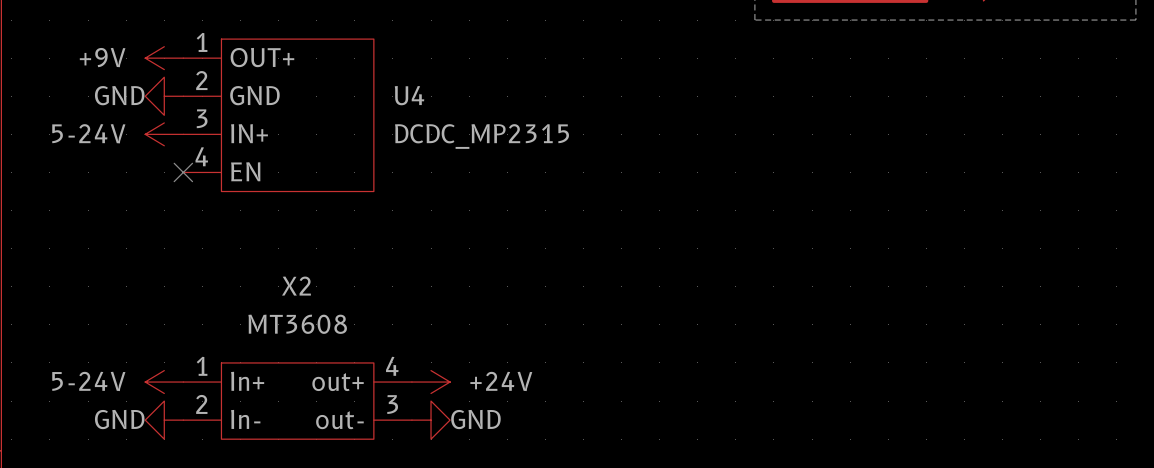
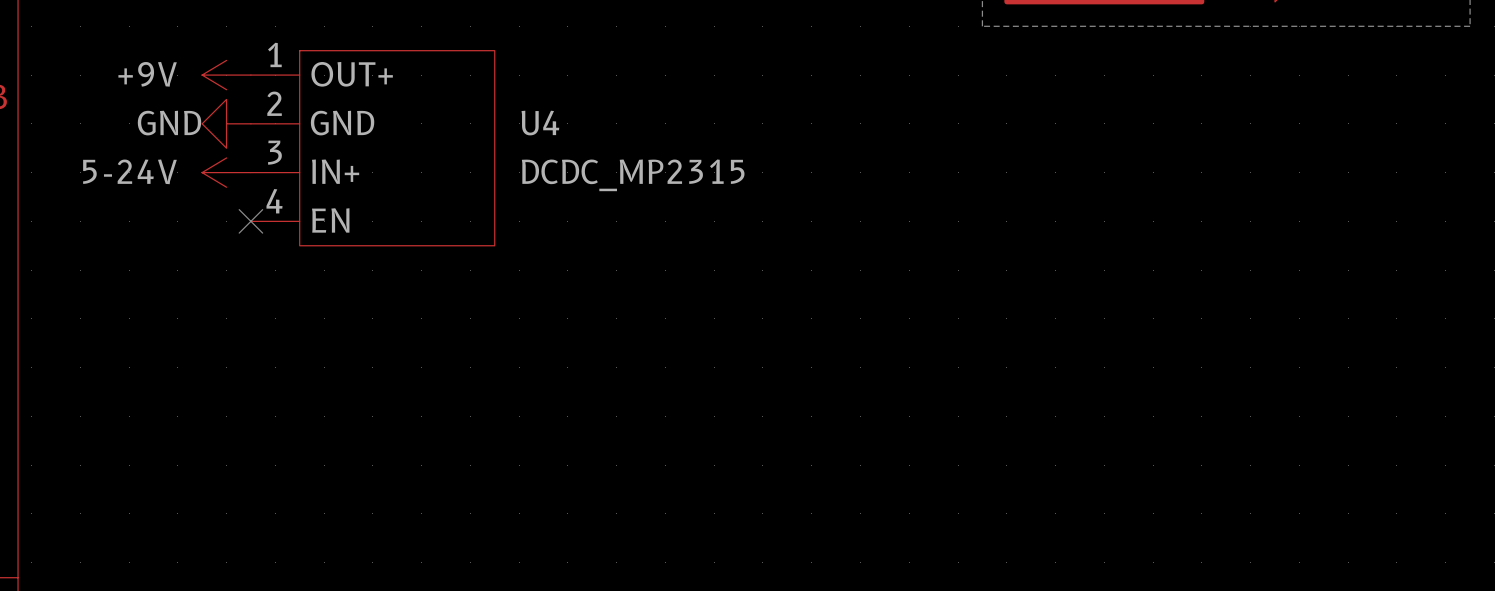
power symbol: 5-24V (164, 382) -> none
power symbol: +24V (431, 382) -> none
X2: MT3608 (297, 401) -> none
power symbol: GND (164, 420) -> none
power symbol: GND (431, 420) -> none

